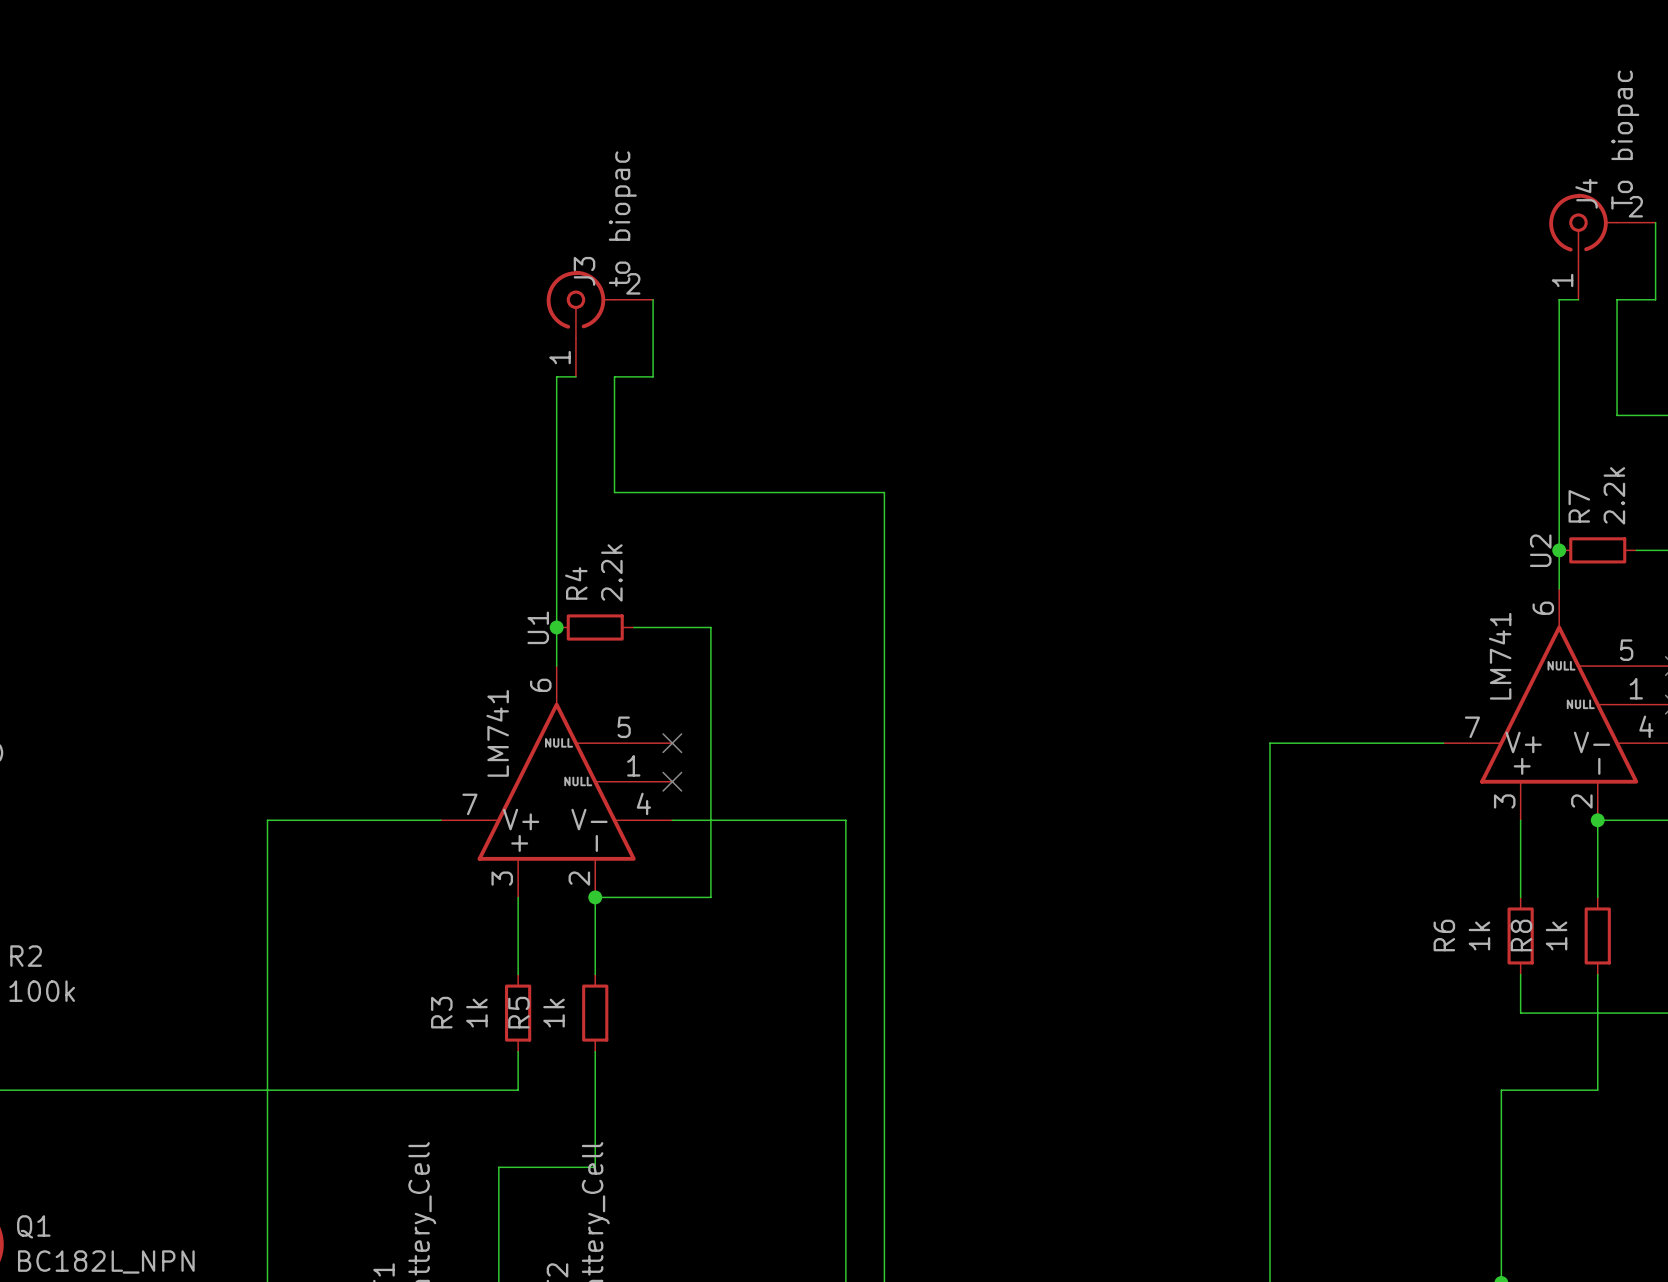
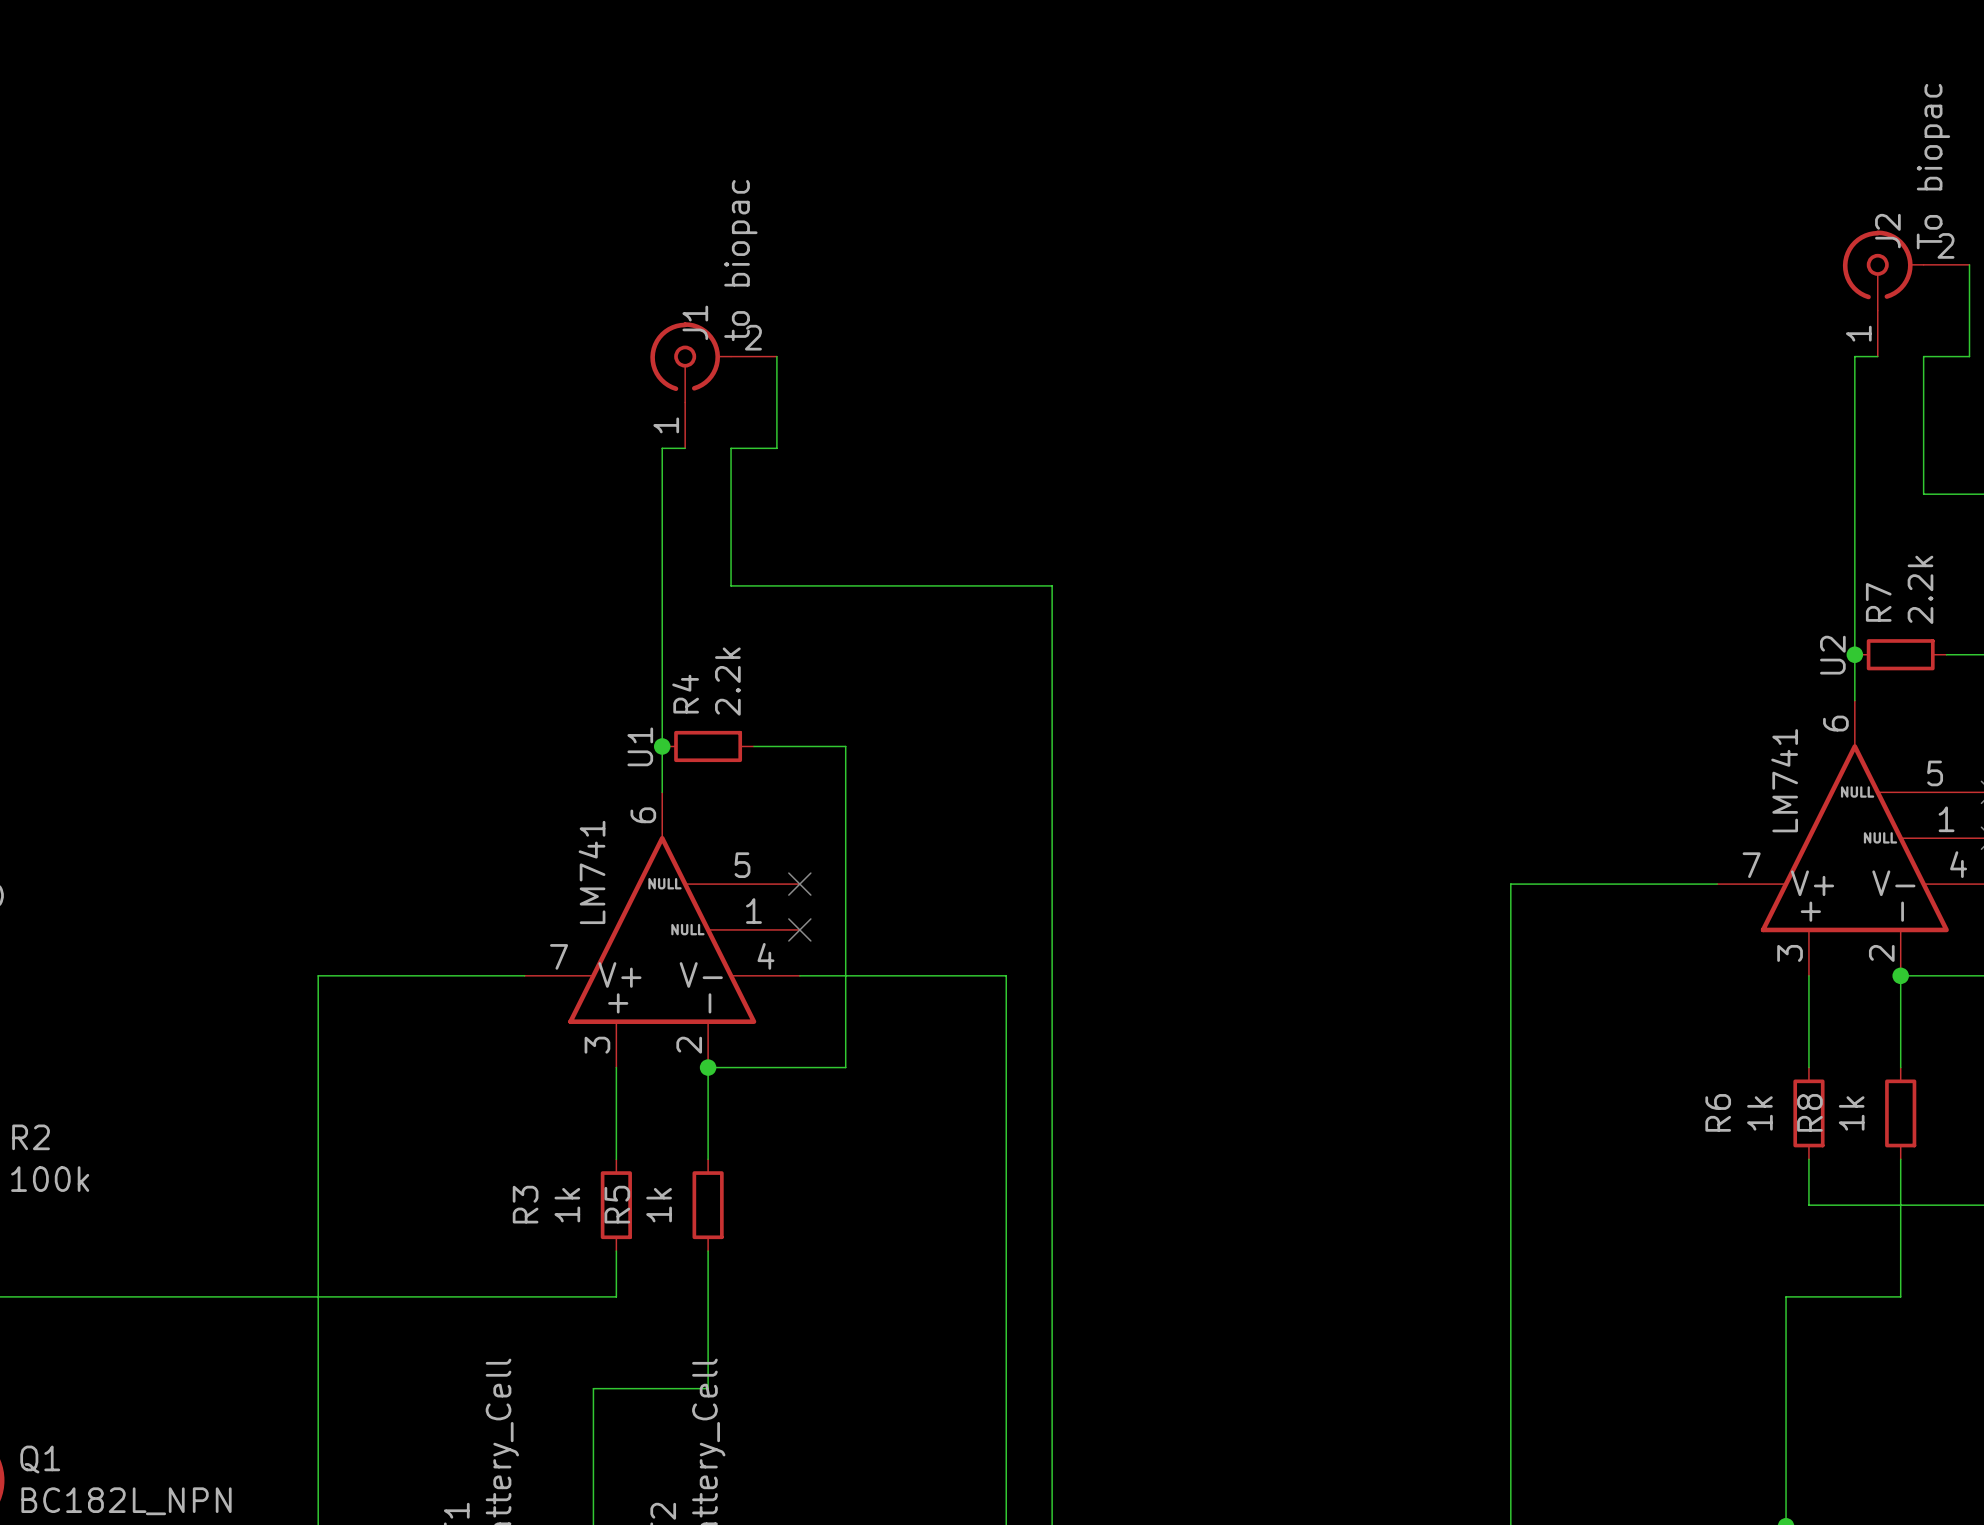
J4 name: J4 (1586, 193) -> J2 (1887, 231)
J3 name: J3 (584, 271) -> J1 (695, 322)

